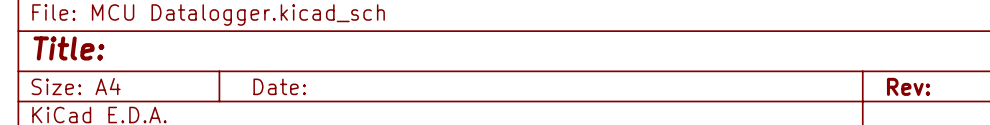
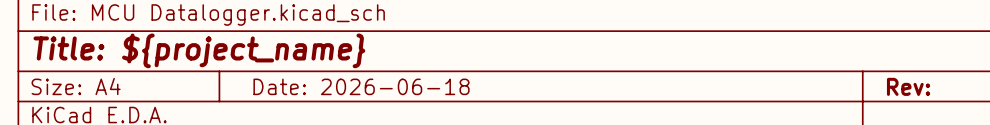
title block: Title: (68, 48) -> Title: ${project_name} (199, 50)
title block: Date: (279, 86) -> Date: 2026-06-18 (361, 86)

